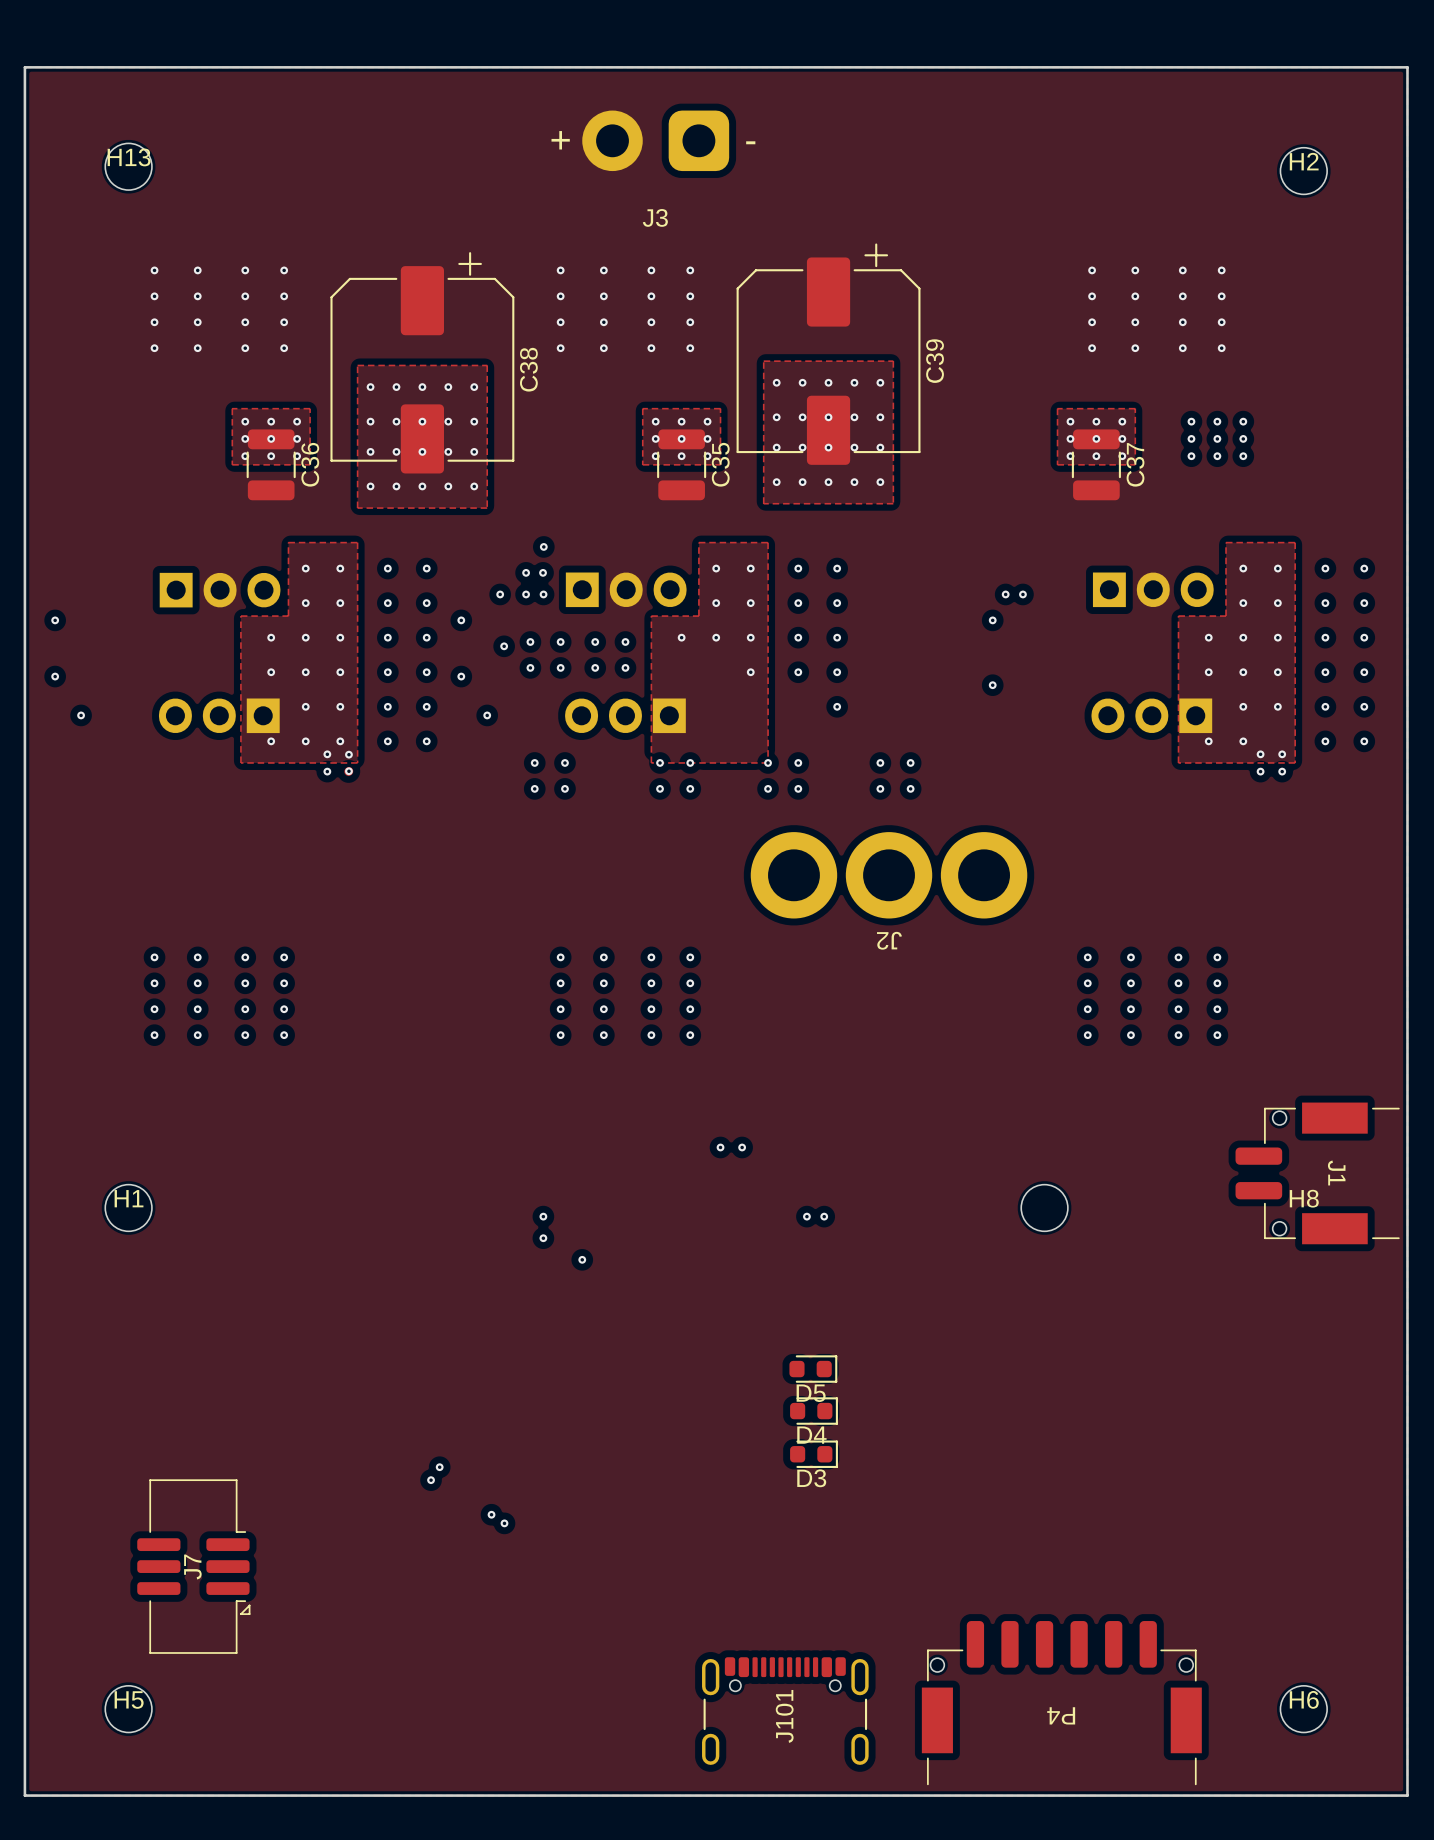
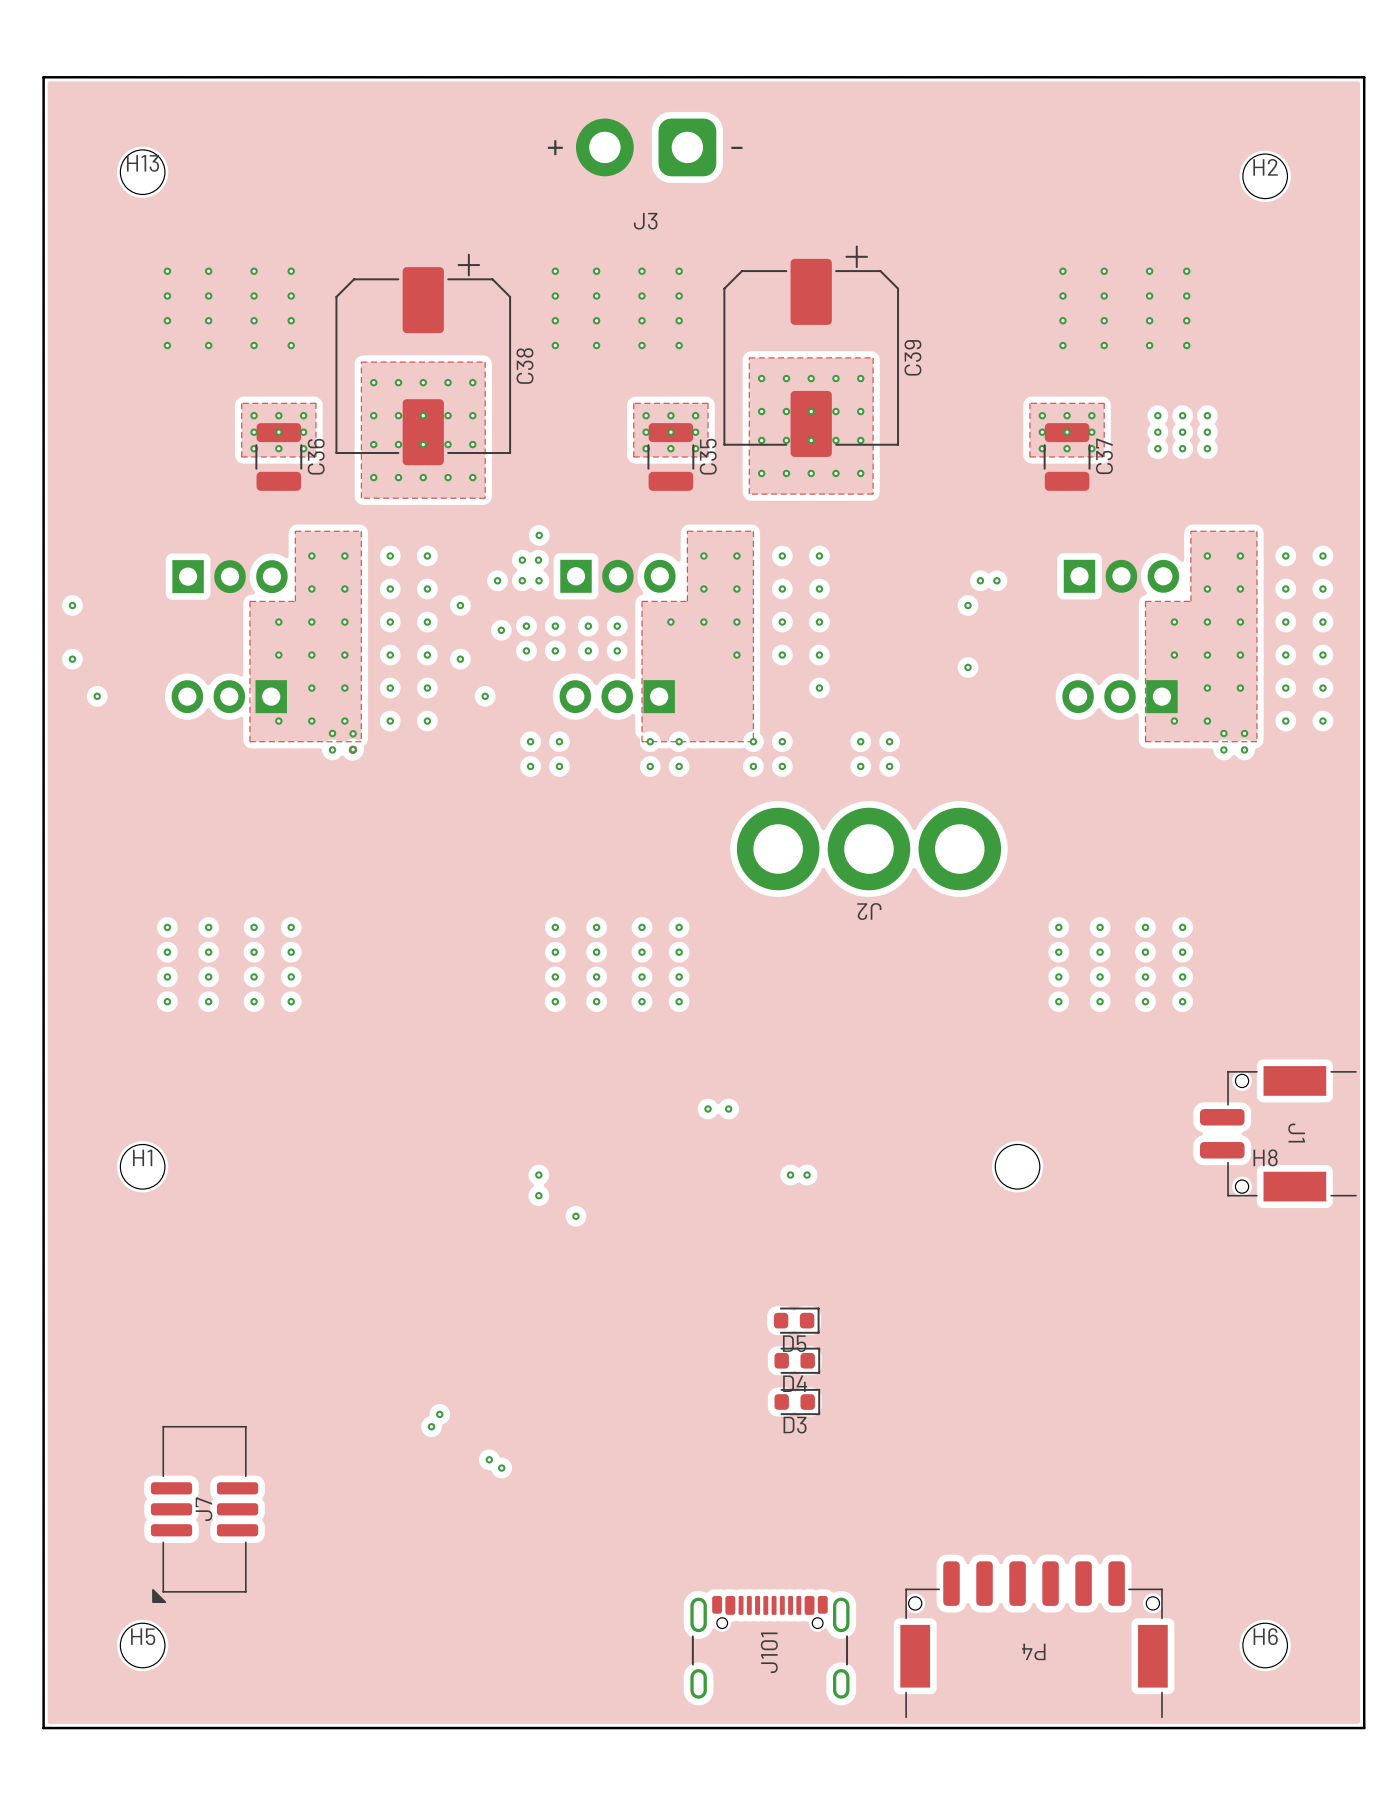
J7 footprint: [137, 1479, 251, 1654] -> [150, 1425, 259, 1604]

